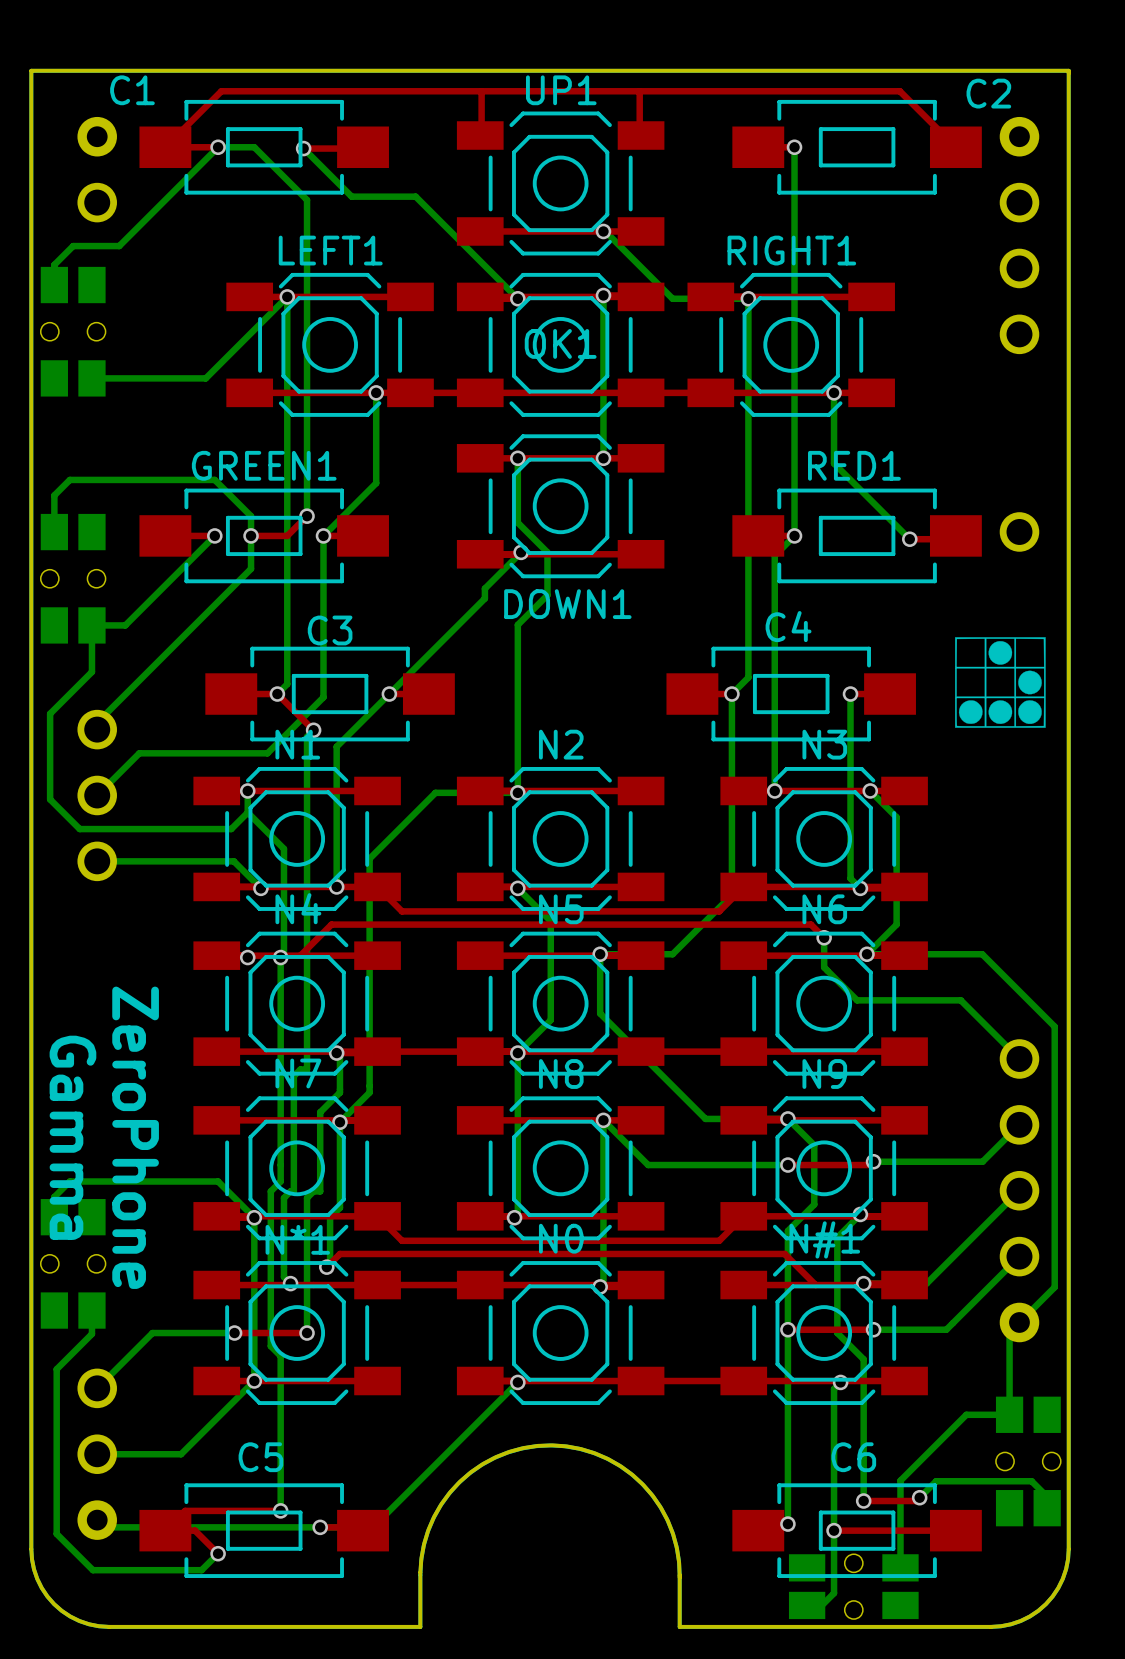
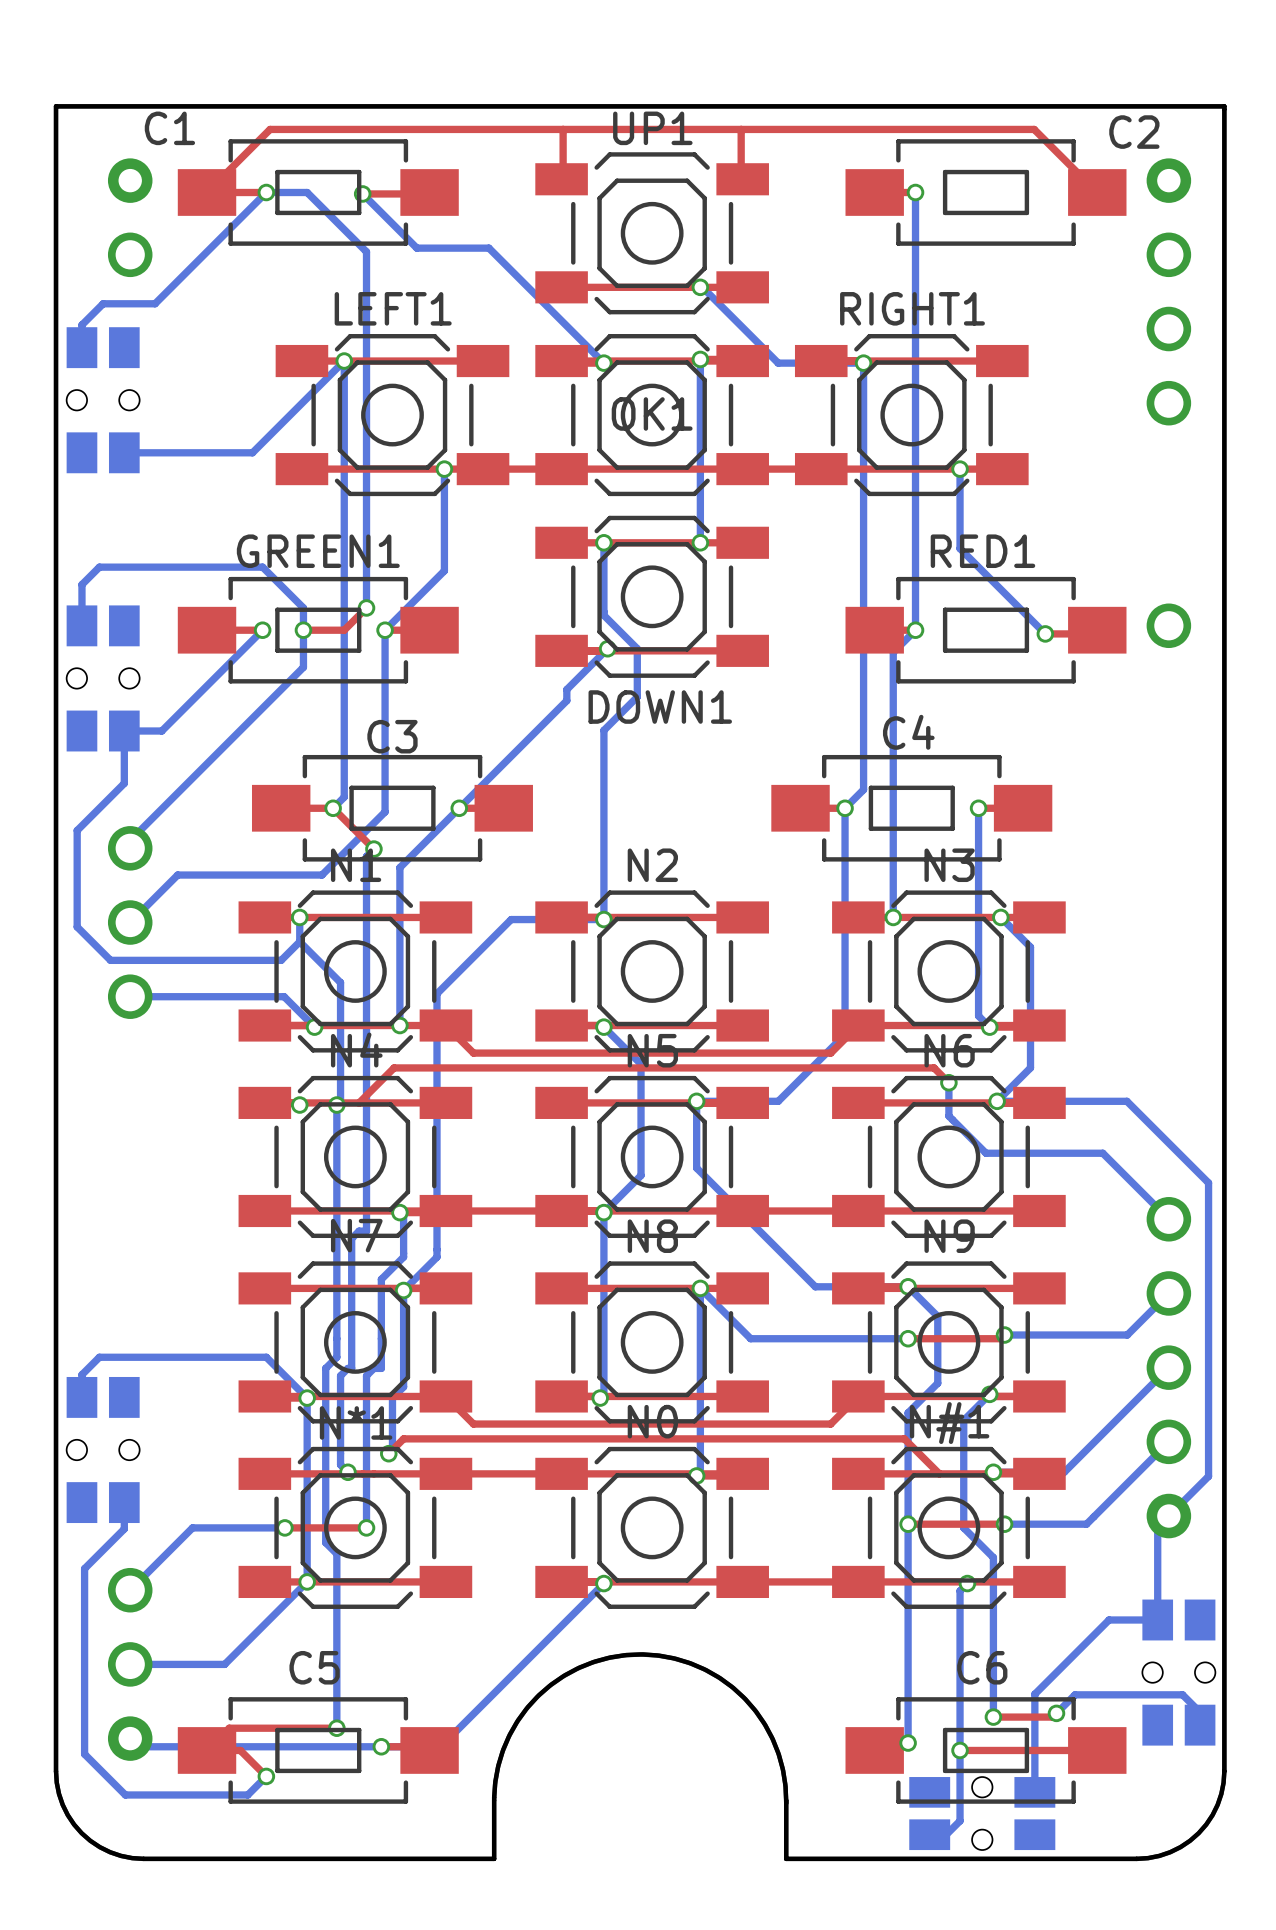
drawing: [955, 637, 1046, 728] -> none
text: Gamma (72, 1137) -> none
text: ZeroPhone (135, 1137) -> none

